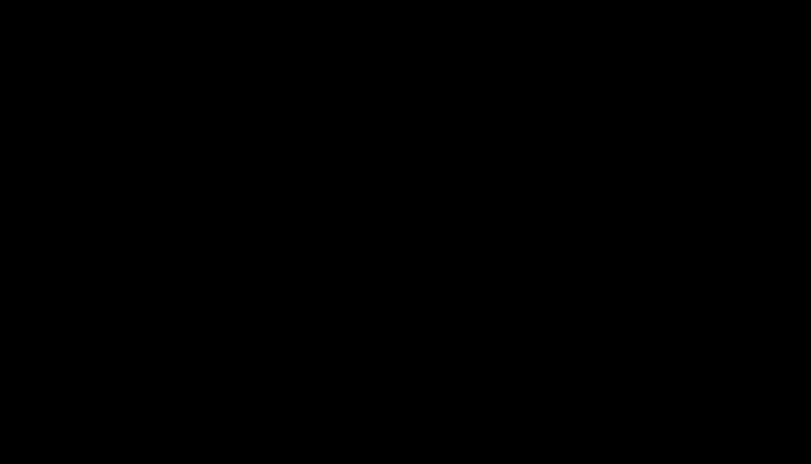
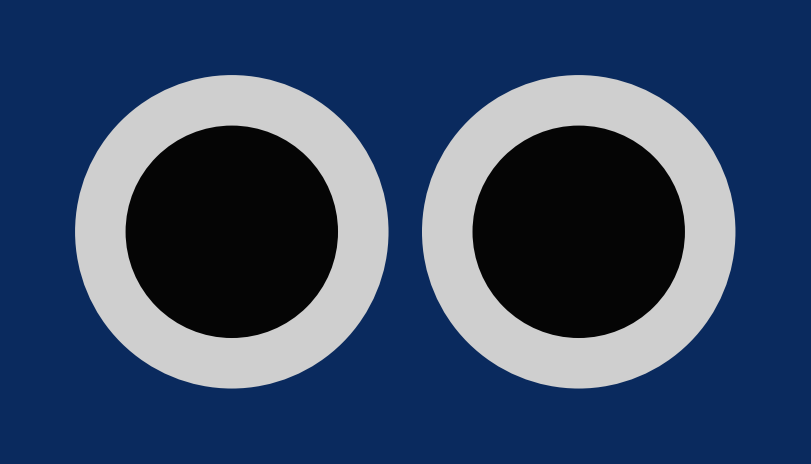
part: none -> (231, 231)
part: none -> (578, 231)

